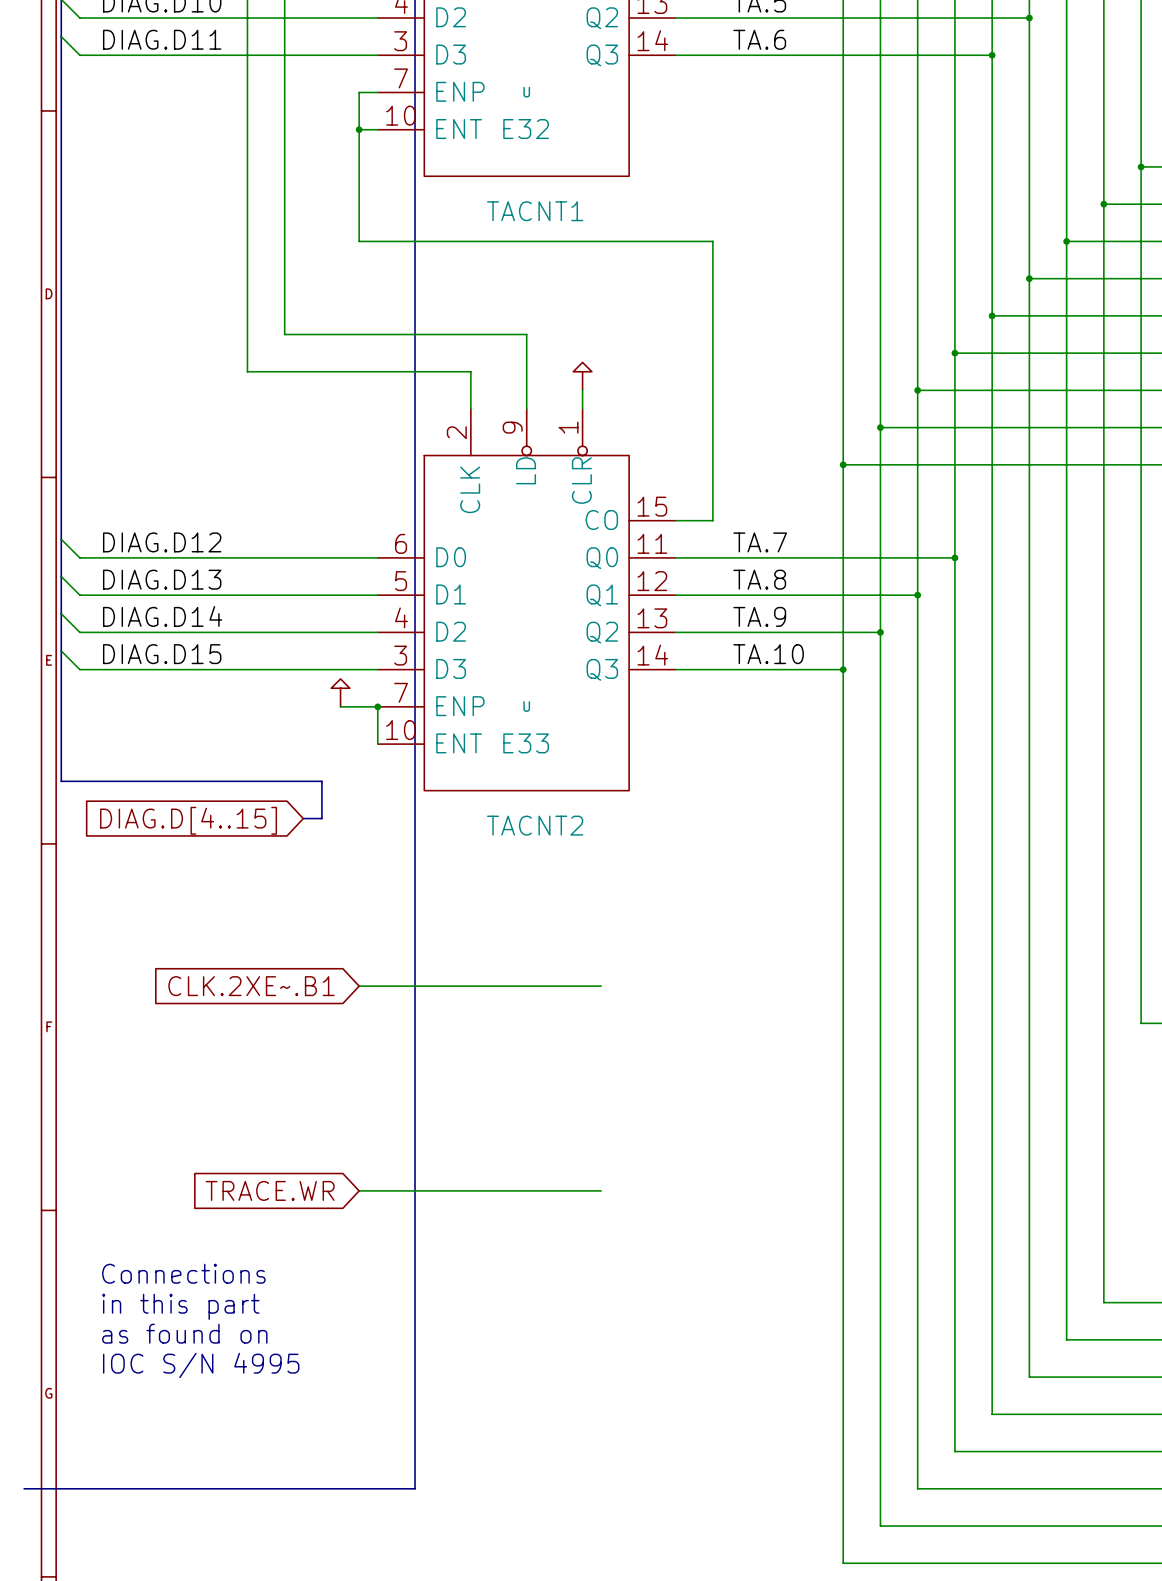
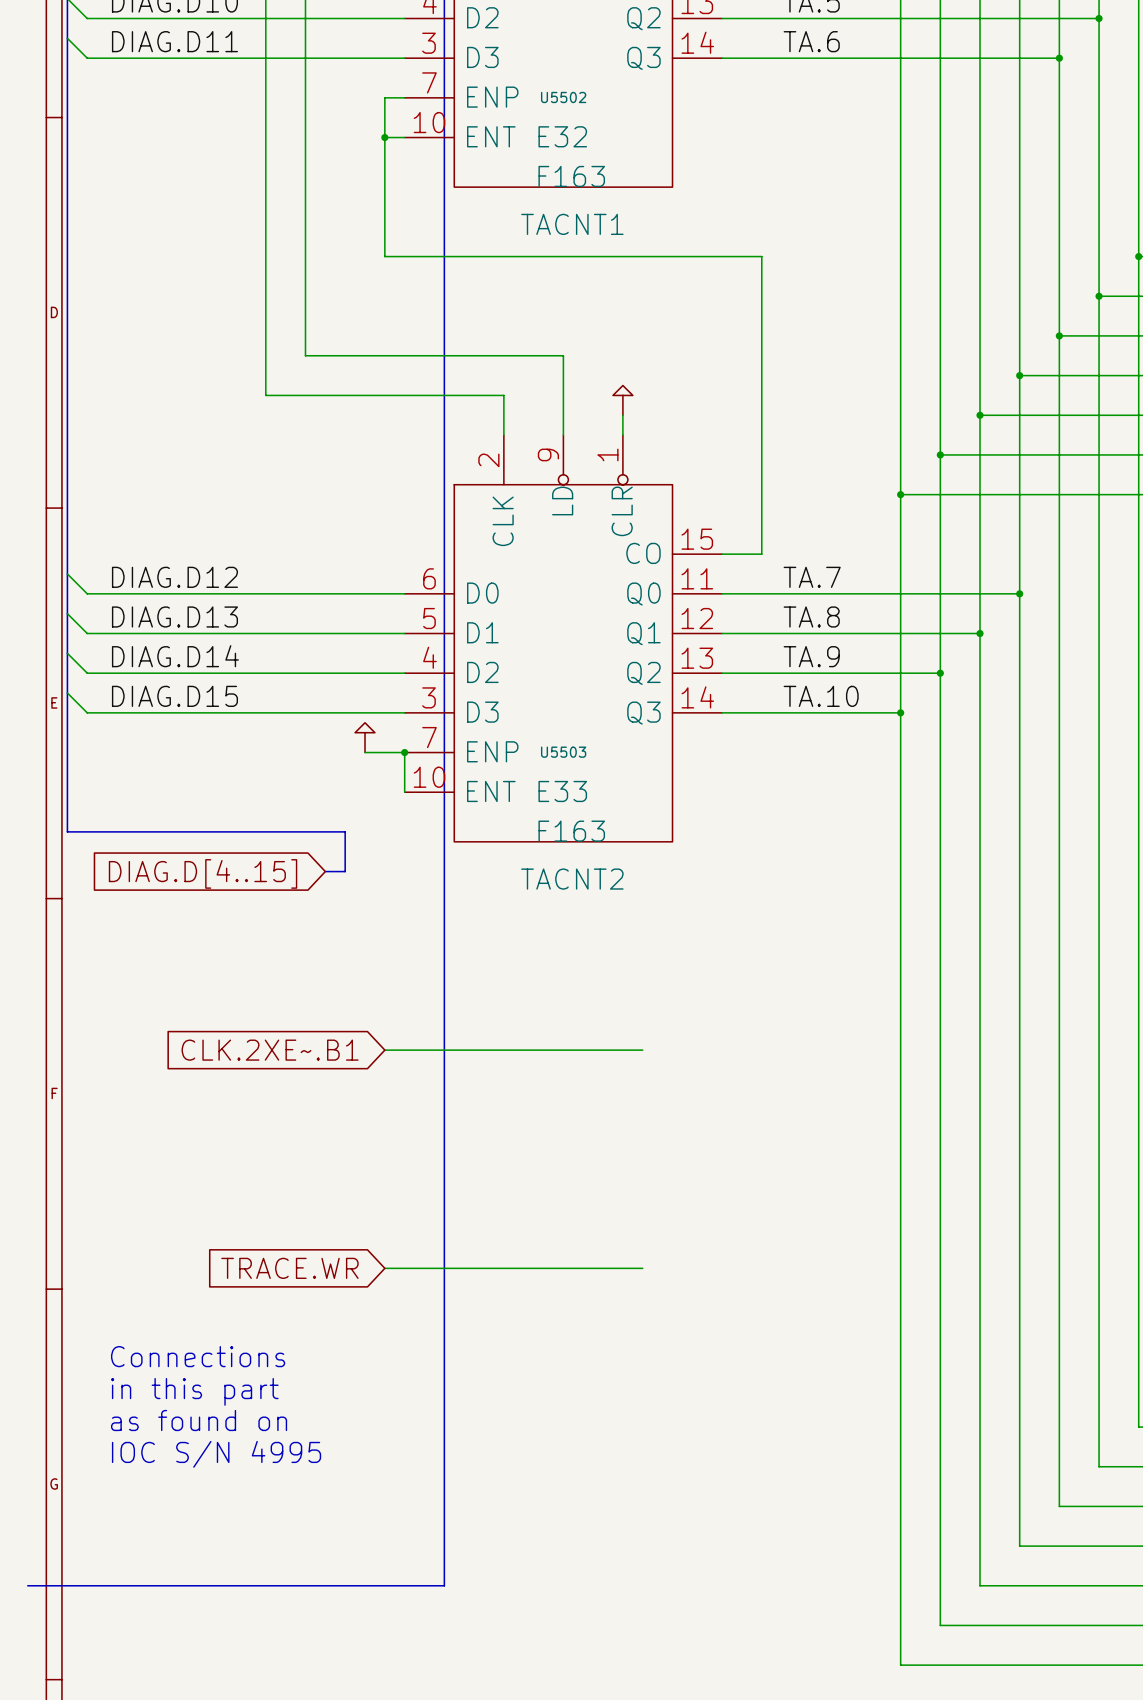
U name: U (526, 92) -> U5502 (563, 97)
U value: none -> F163 (571, 176)
U name: U (526, 706) -> U5503 (563, 752)
U value: none -> F163 (571, 831)

